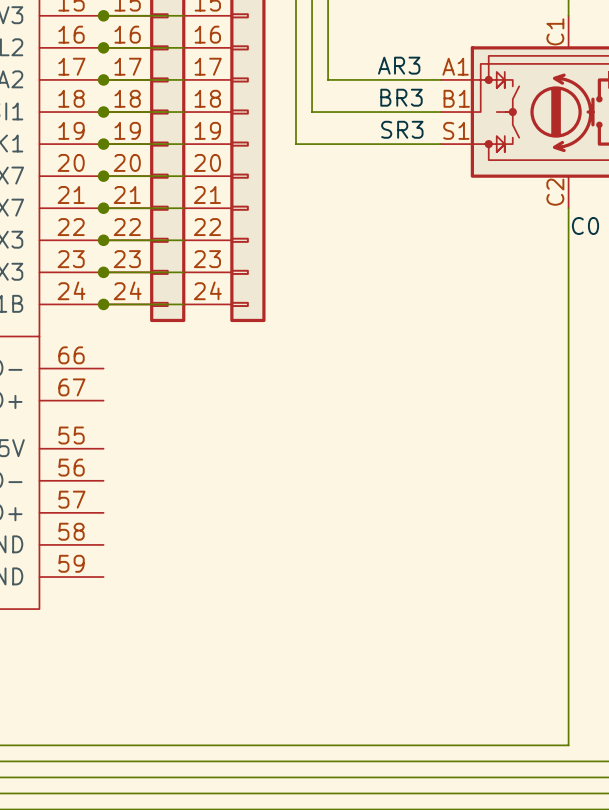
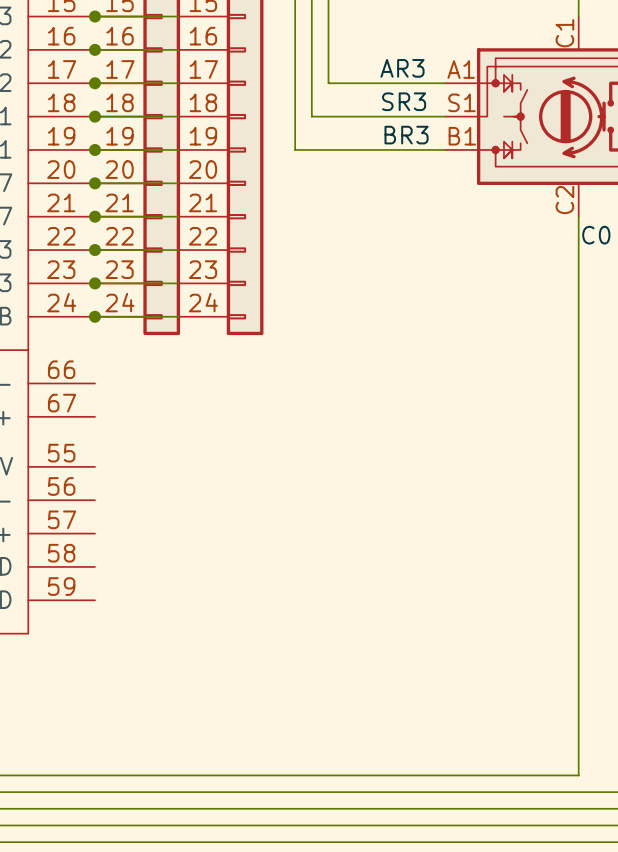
label: BR3 (401, 97) -> SR3 (404, 101)
part pin number: B1 (456, 98) -> S1 (461, 102)
label: SR3 (402, 129) -> BR3 (406, 135)
part pin number: S1 (456, 130) -> B1 (462, 136)

